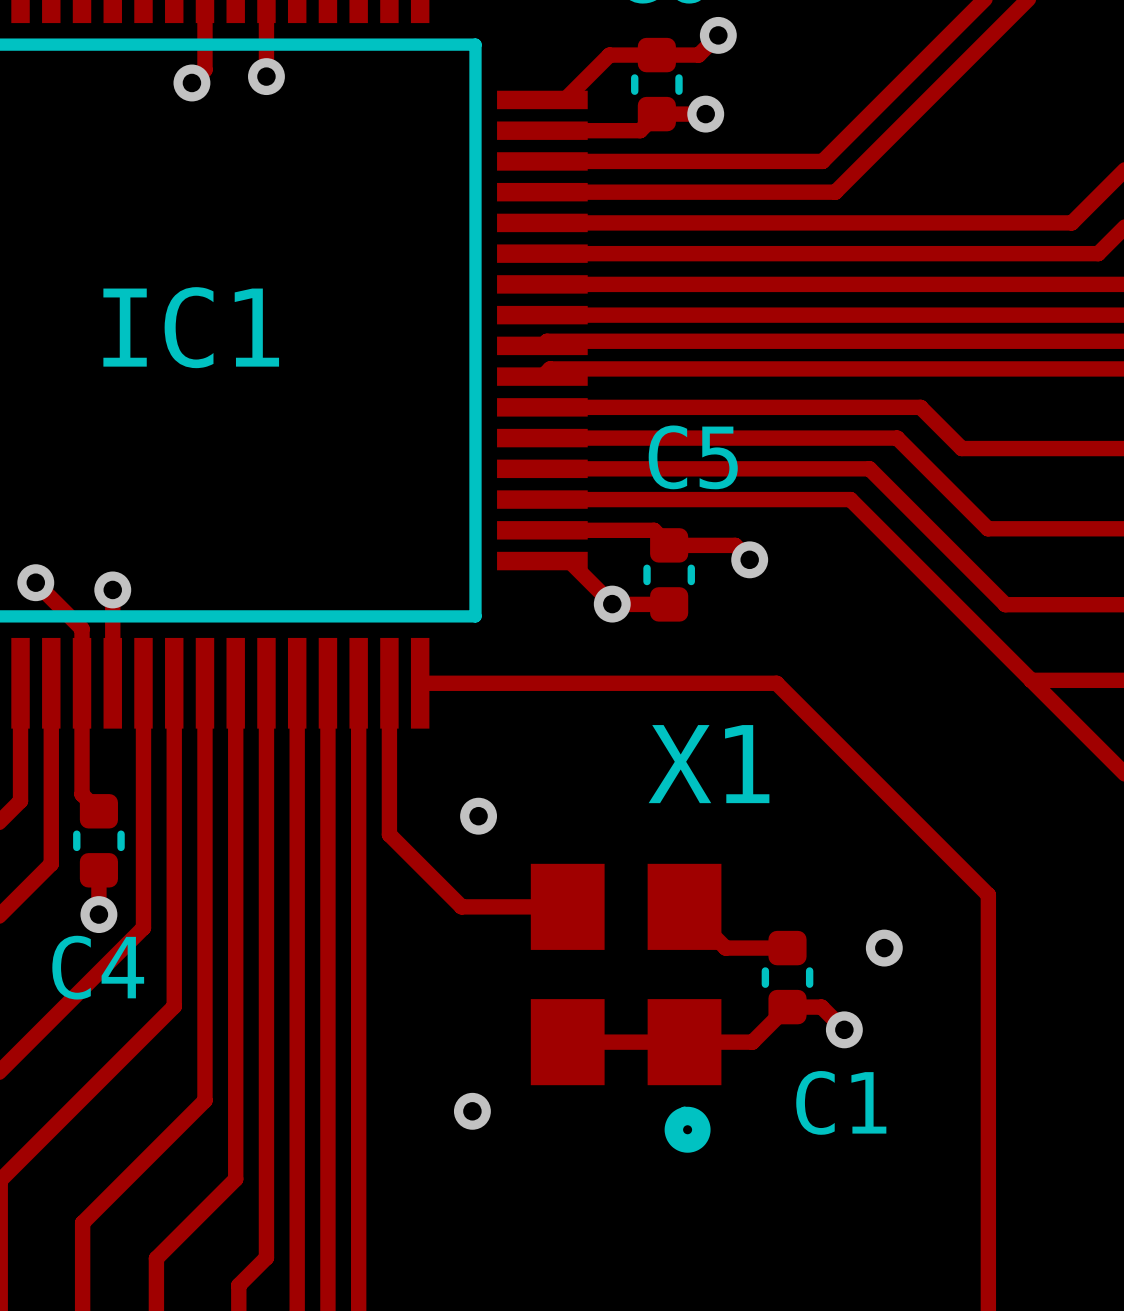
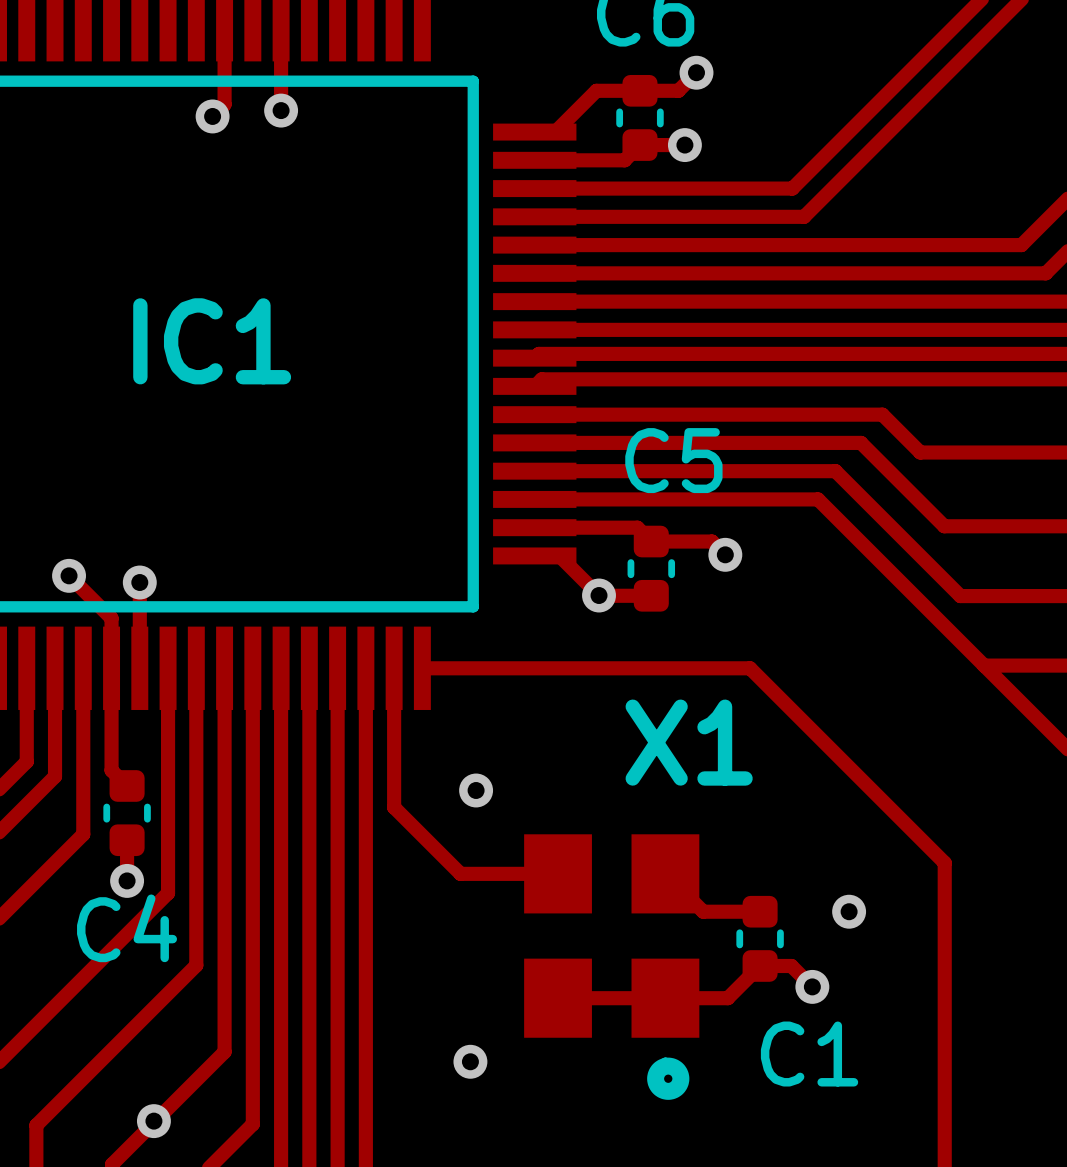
via: none -> (153, 1121)

